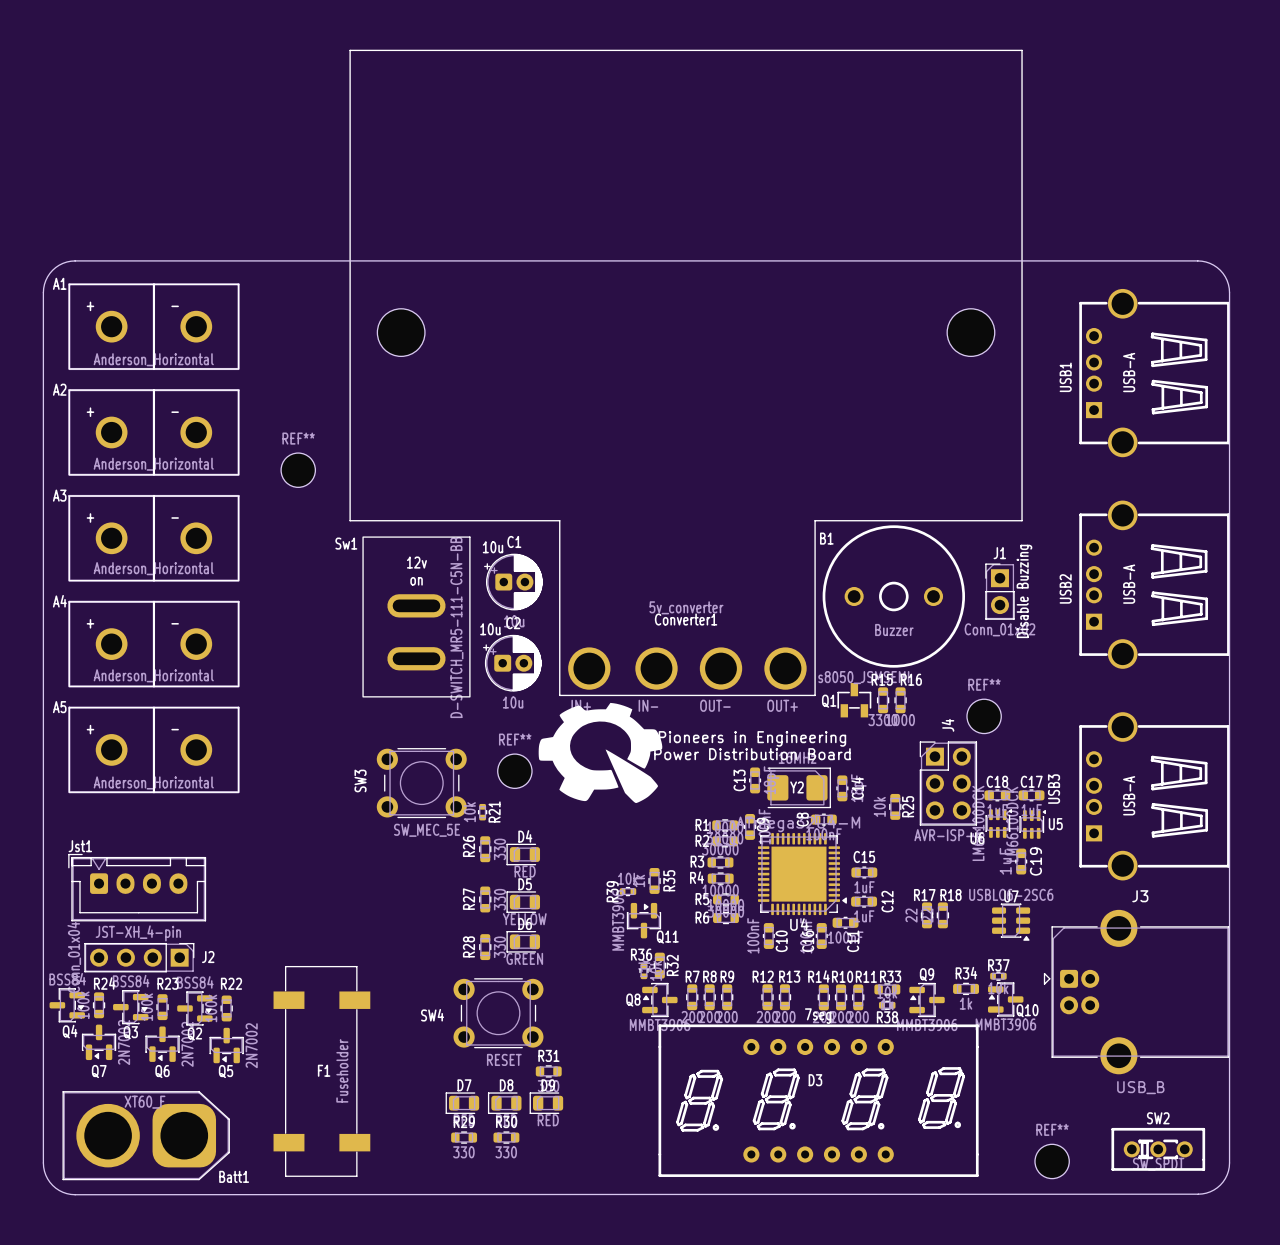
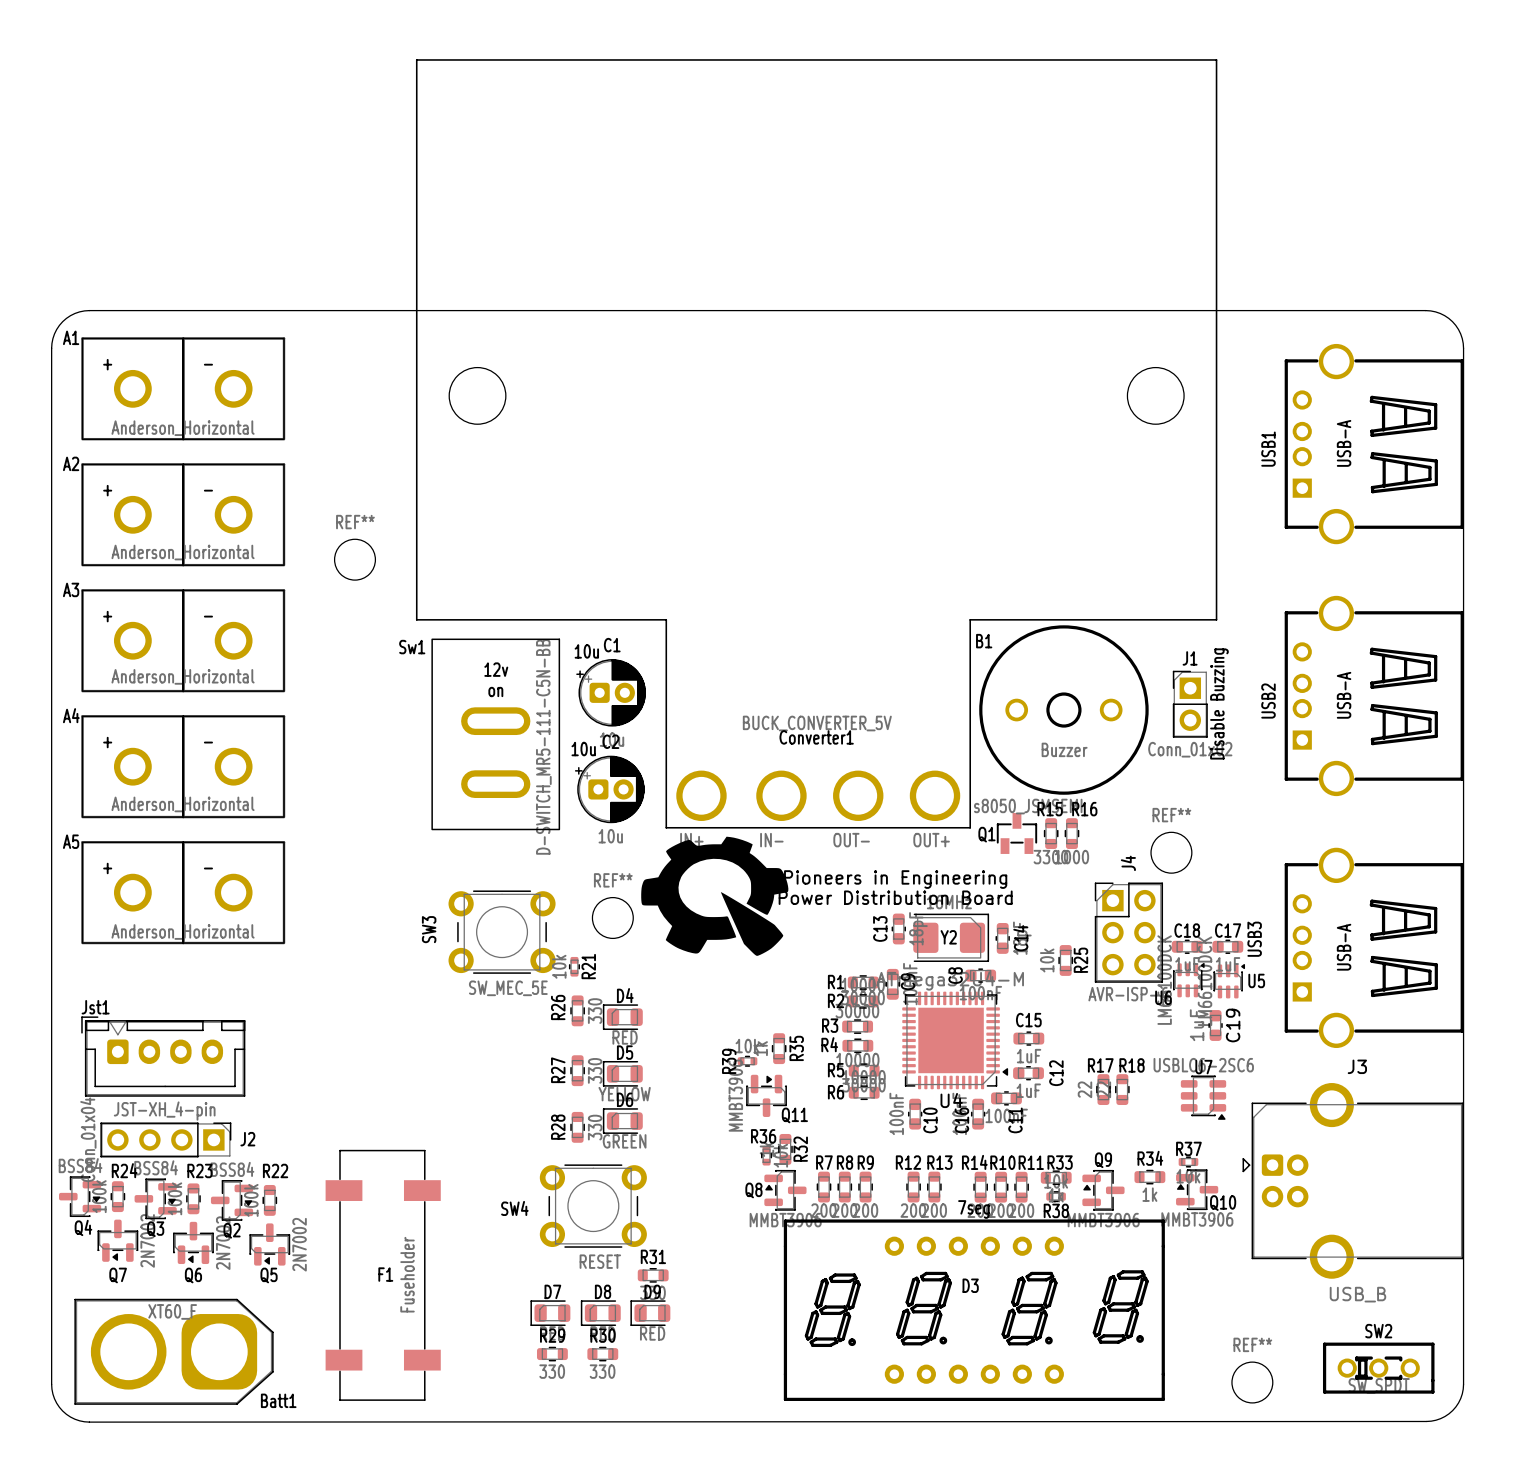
Converter1 value: 5v_converter (686, 607) -> BUCK_CONVERTER_5V (817, 723)

